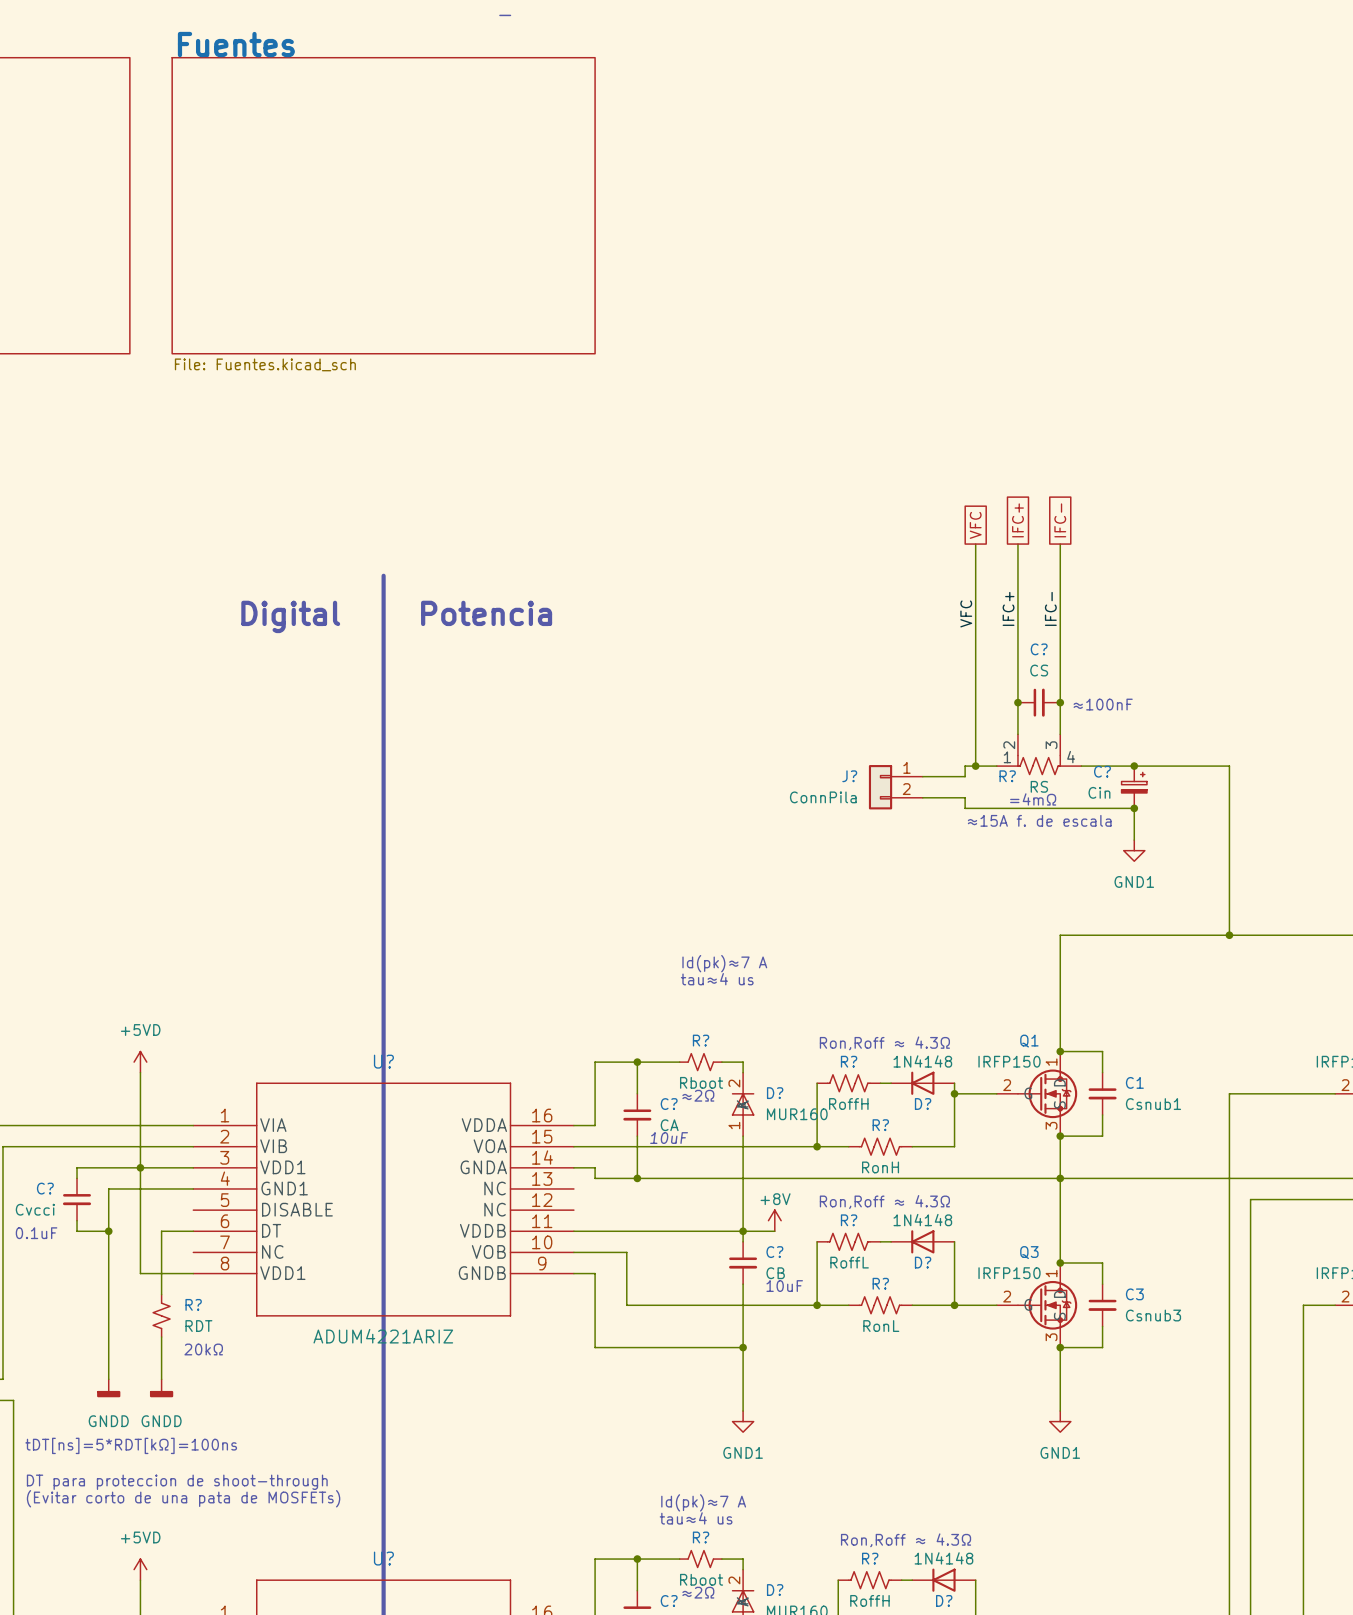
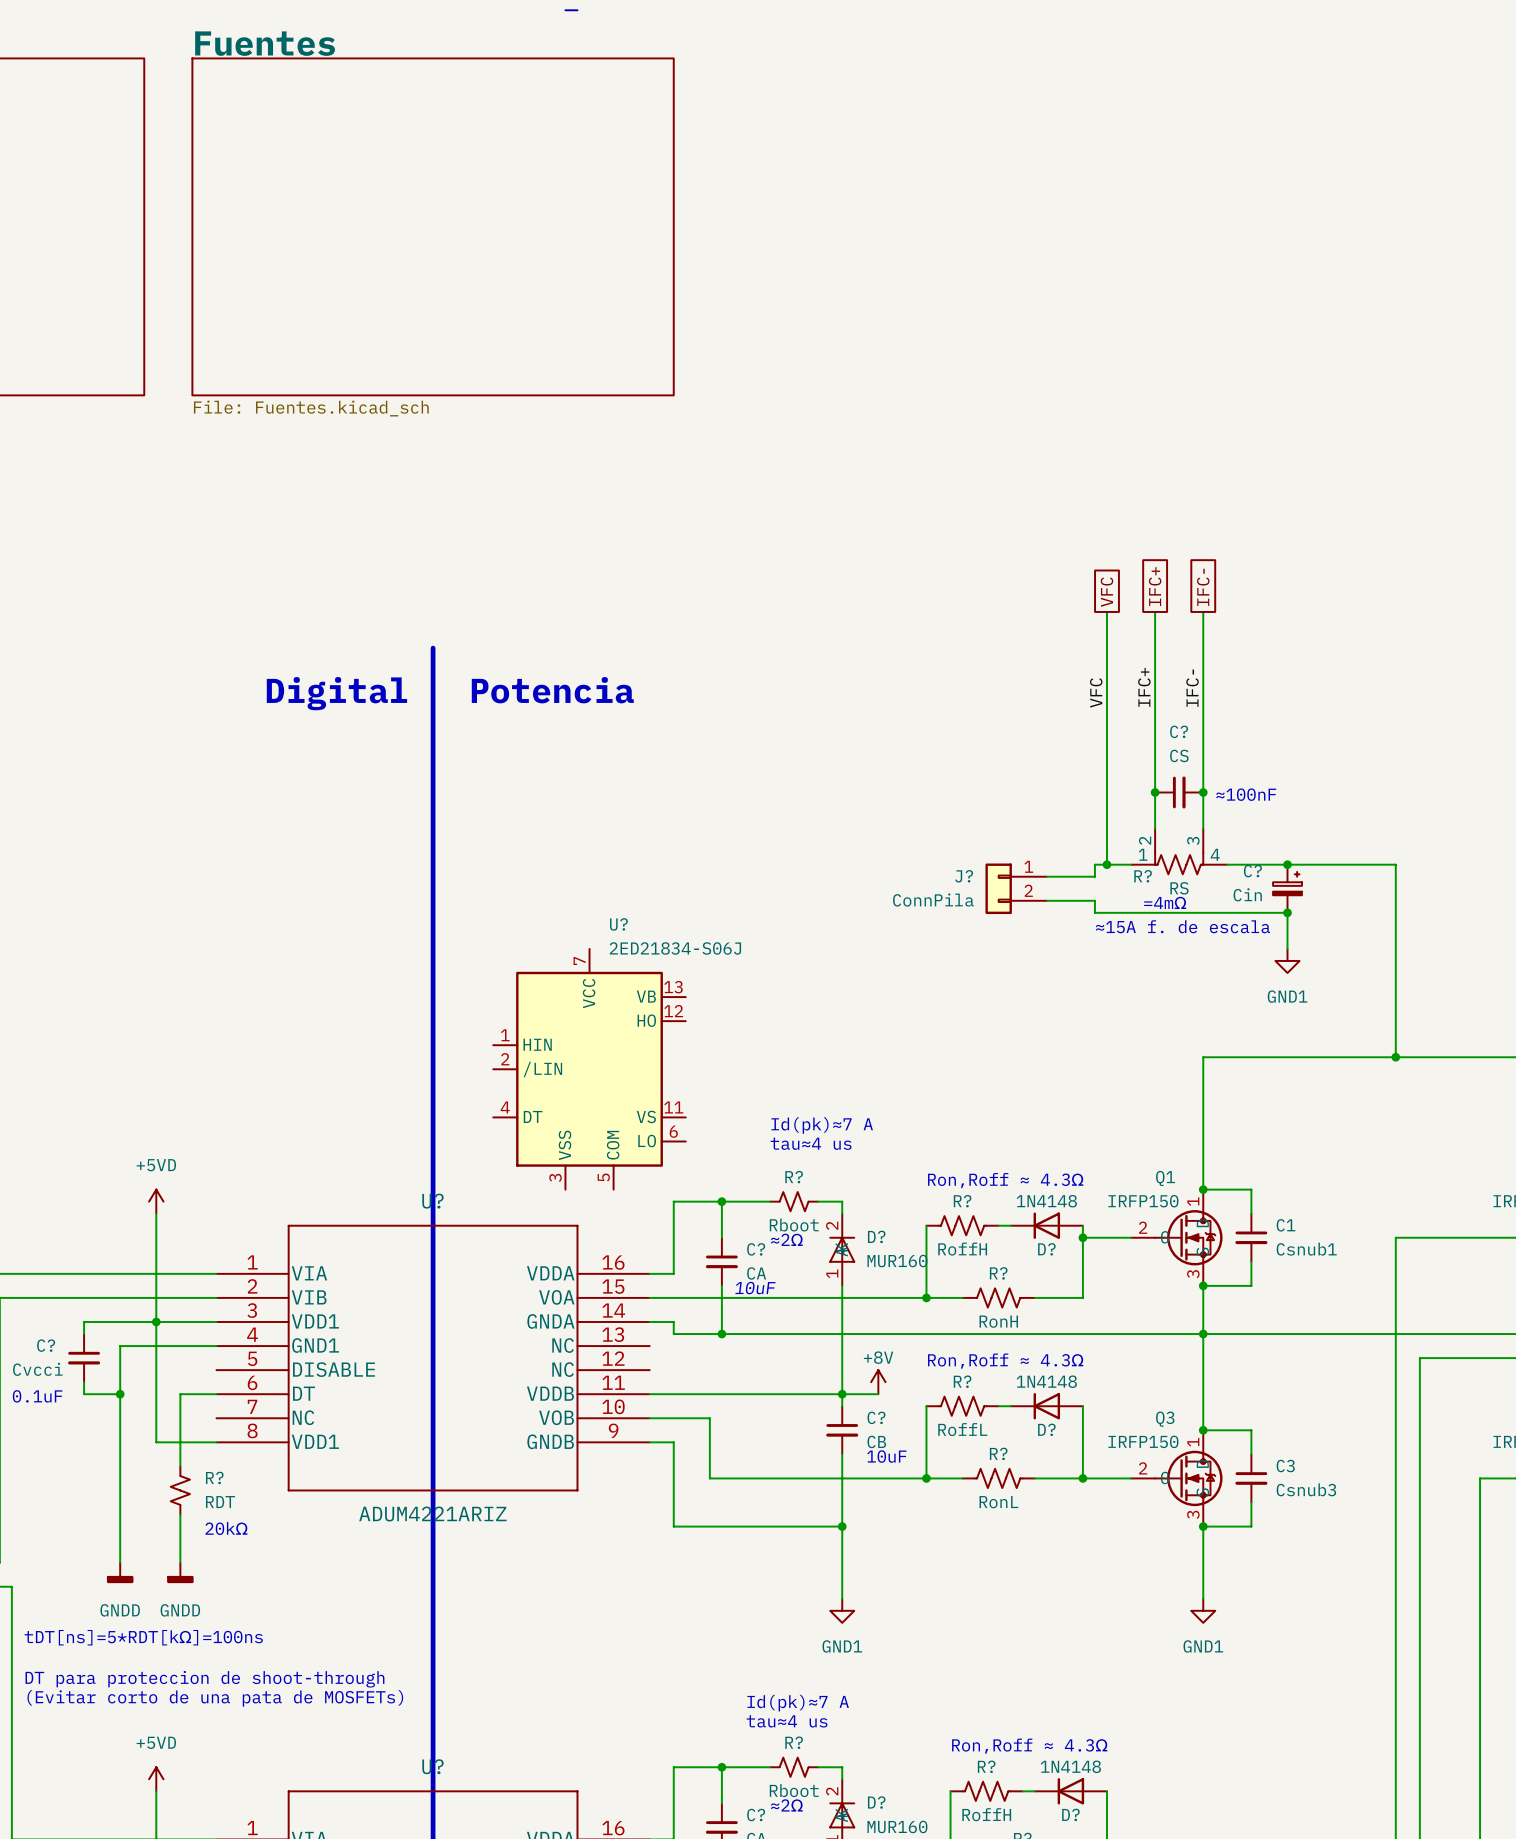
U?: none -> 2ED21834-S06J (589, 1069)
text position: Id(pk)≈7 A (724, 963) -> Id(pk)≈7 A (822, 1125)
text position: tau≈4 us (717, 979) -> tau≈4 us (811, 1143)

